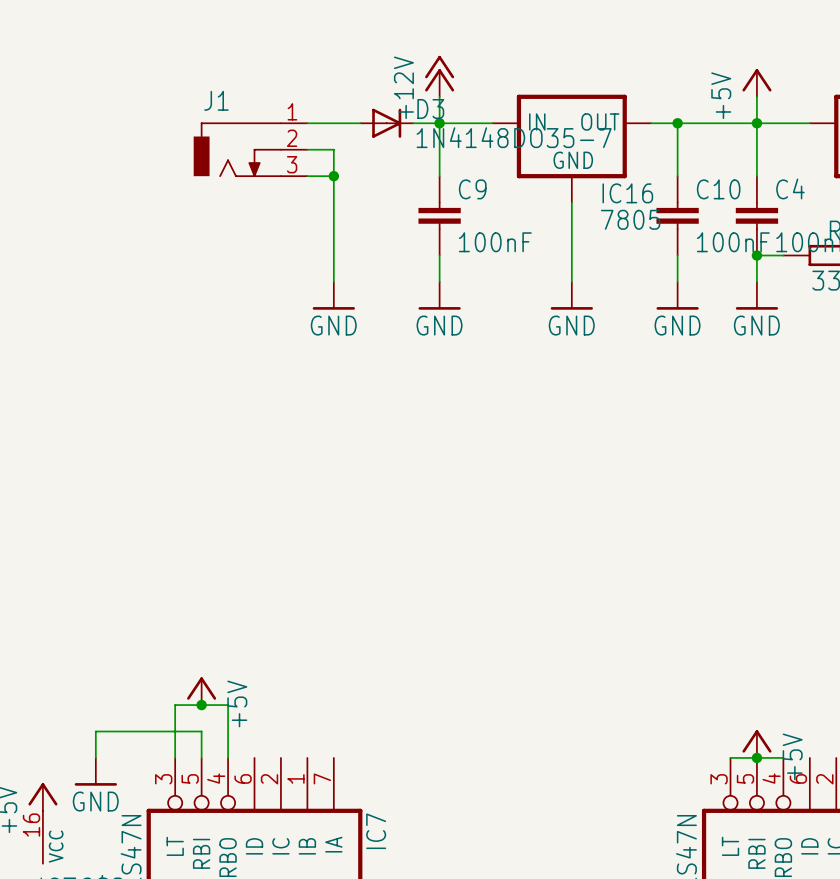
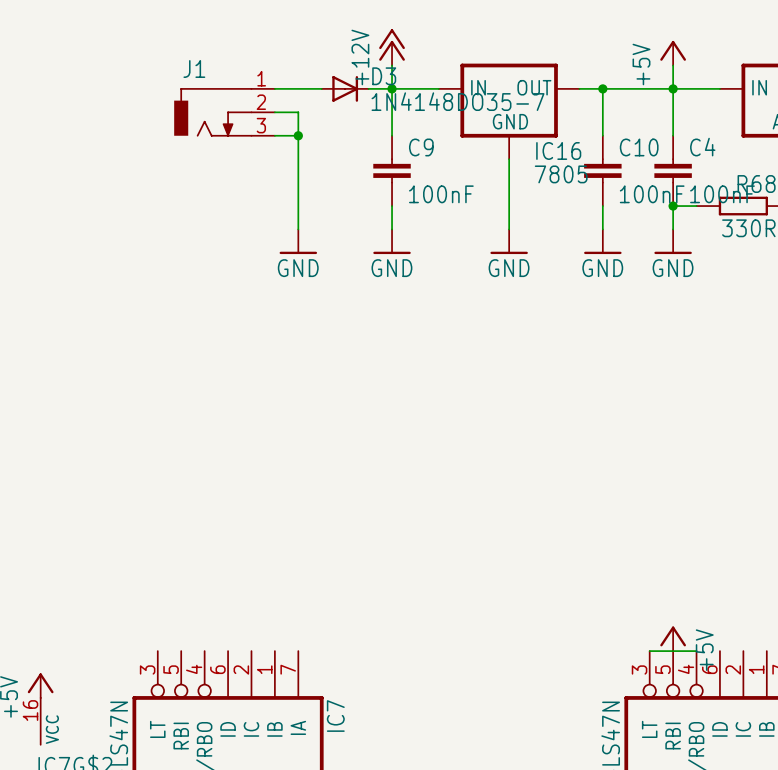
power symbol: +5V (201, 691) -> none
junction: (201, 705) -> none
wire: (95, 757) (95, 731) (201, 731) (201, 757) -> none
wire: (175, 757) (175, 705) (228, 705) (228, 757) -> none
junction: (756, 757) -> none
power symbol: GND (95, 771) -> none

